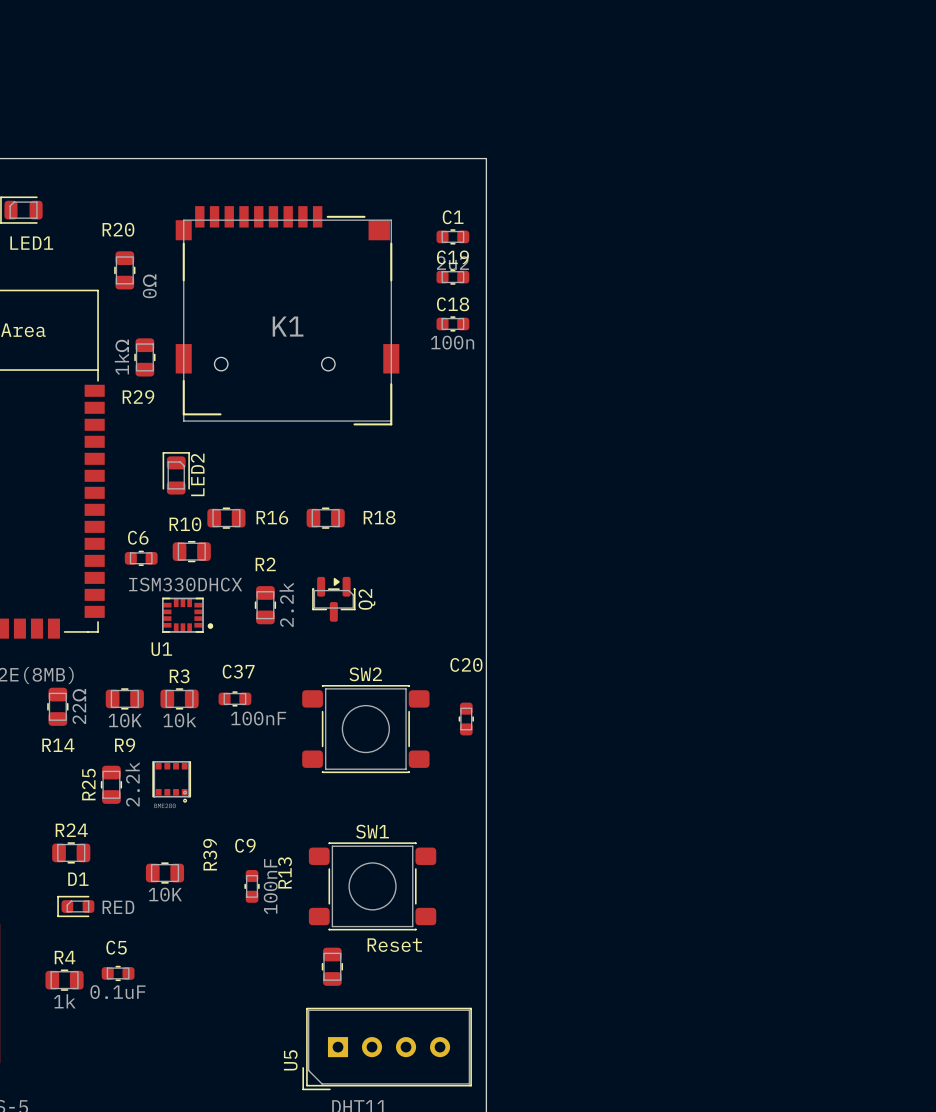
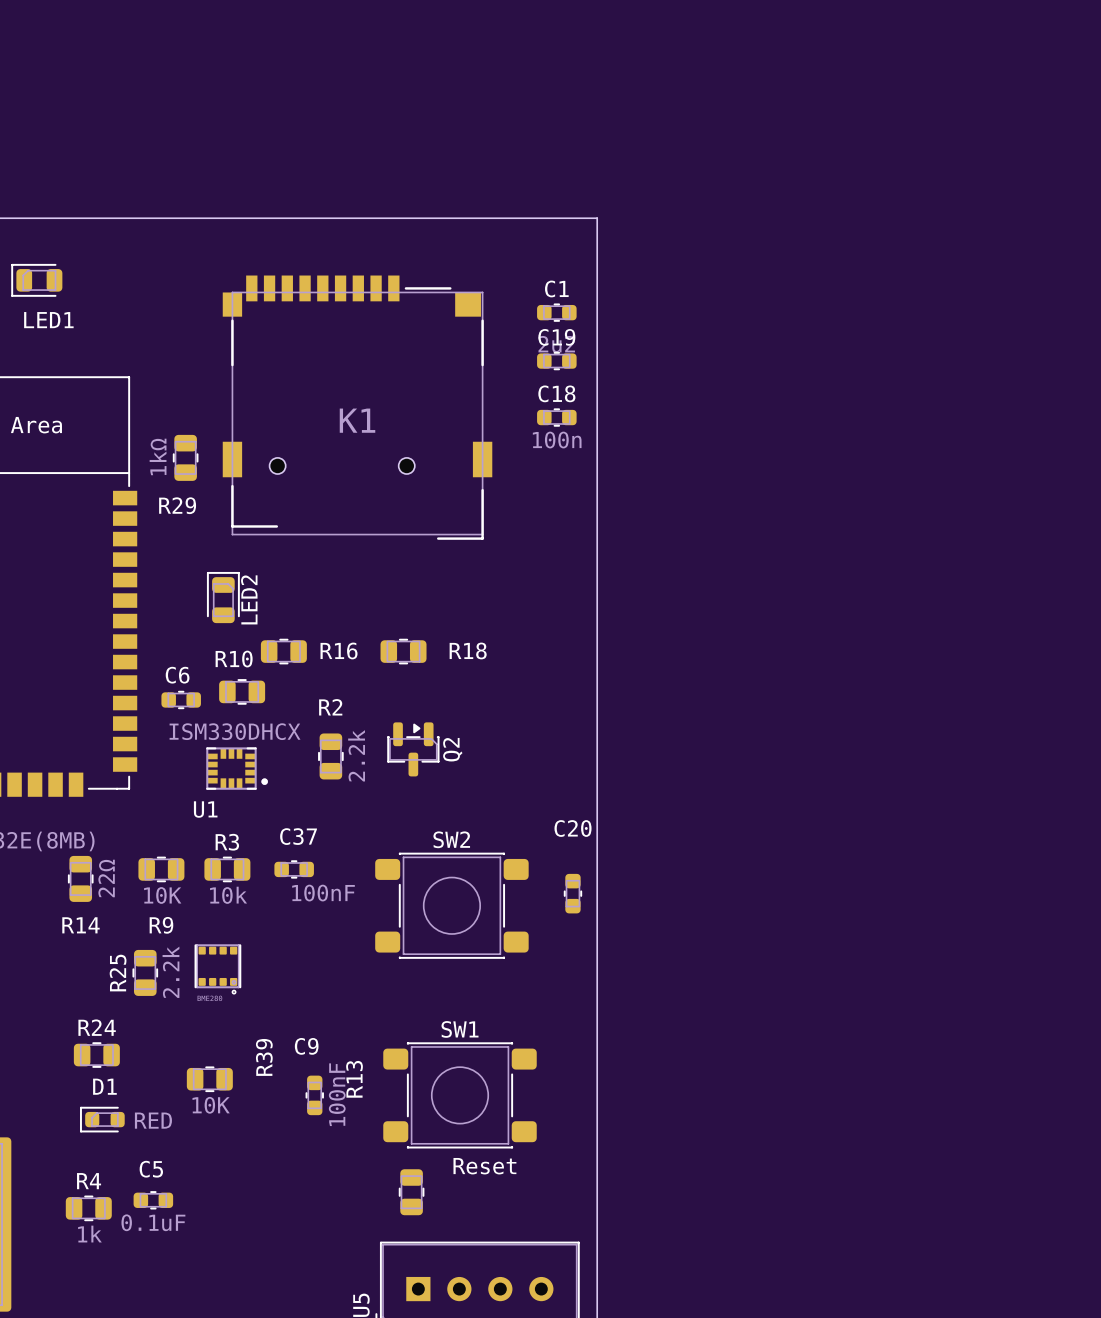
R20: 0Ω (124, 270) -> none

